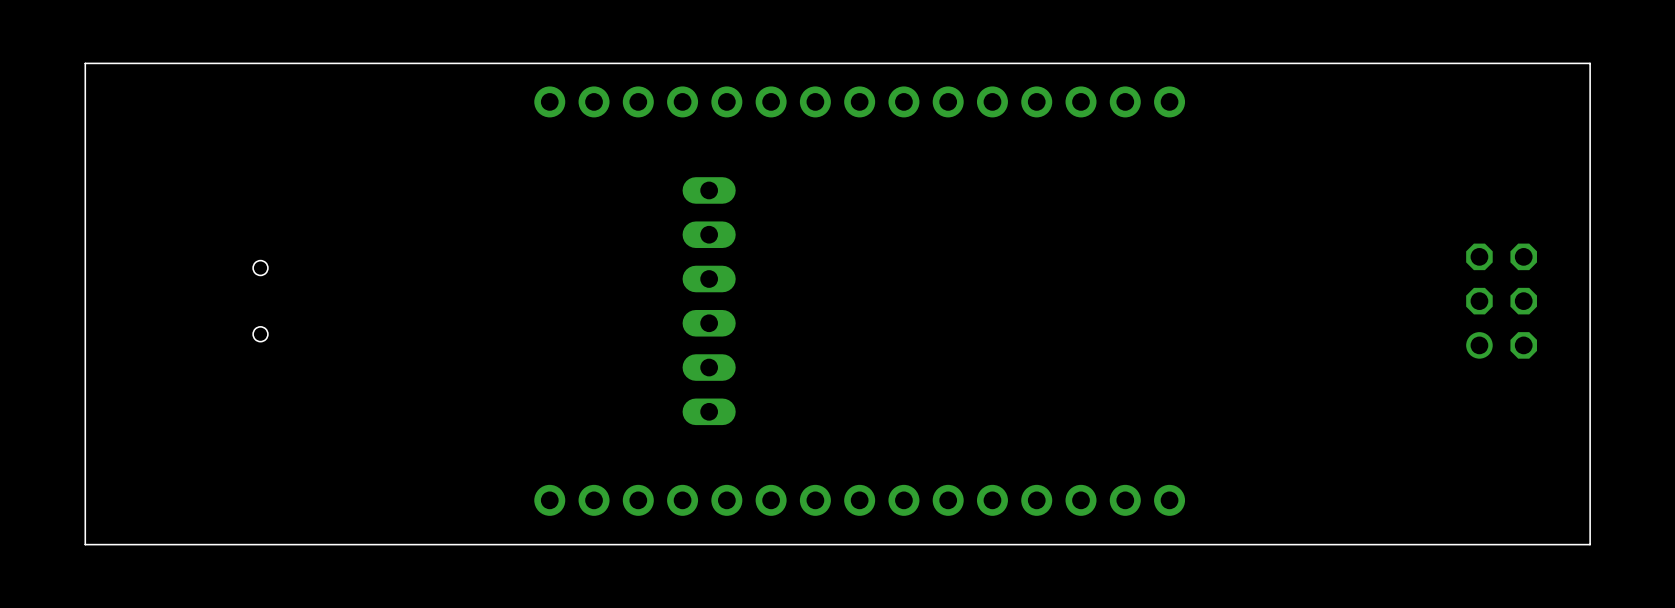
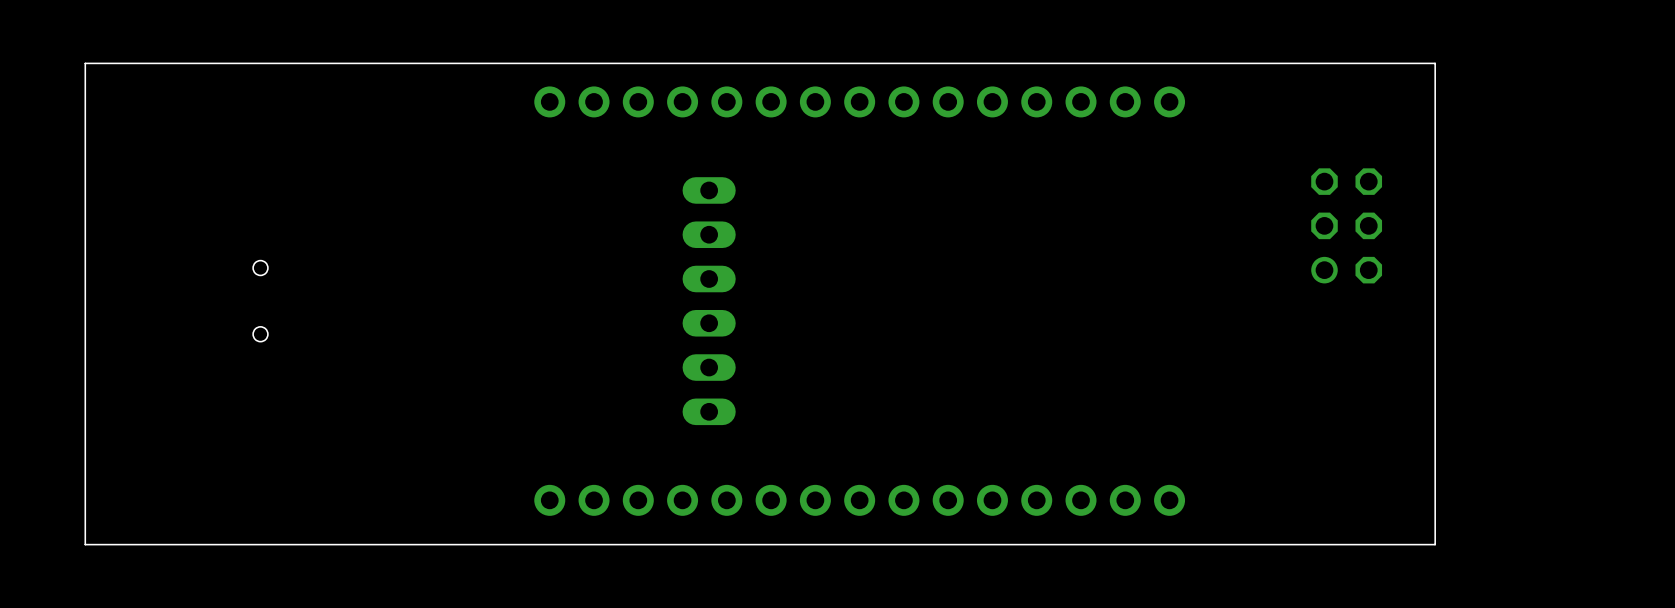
board edge: (1435, 63) (1590, 63) (1590, 544) (1435, 544) -> (1435, 63) (1435, 544)
part position: (1501, 301) -> (1346, 225)

